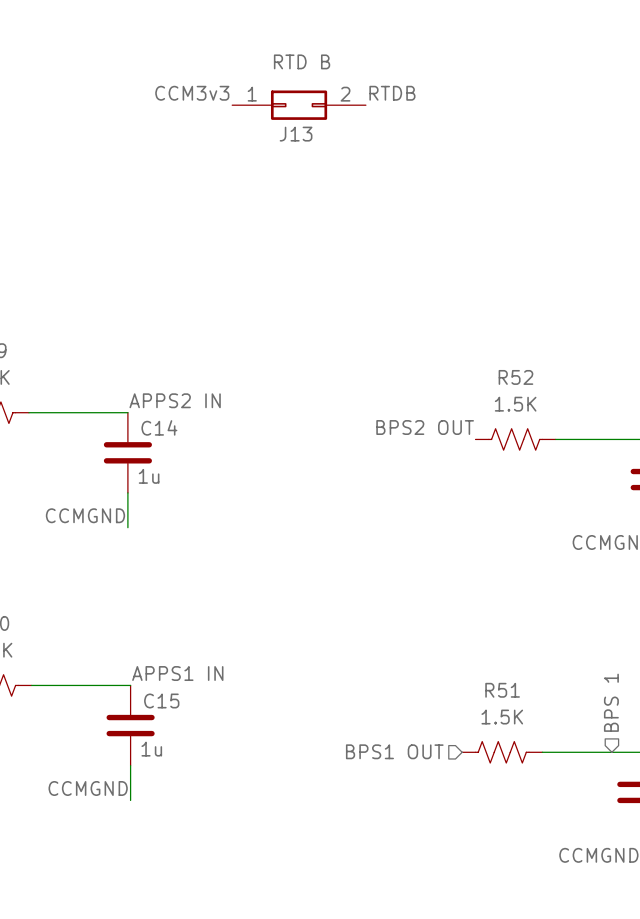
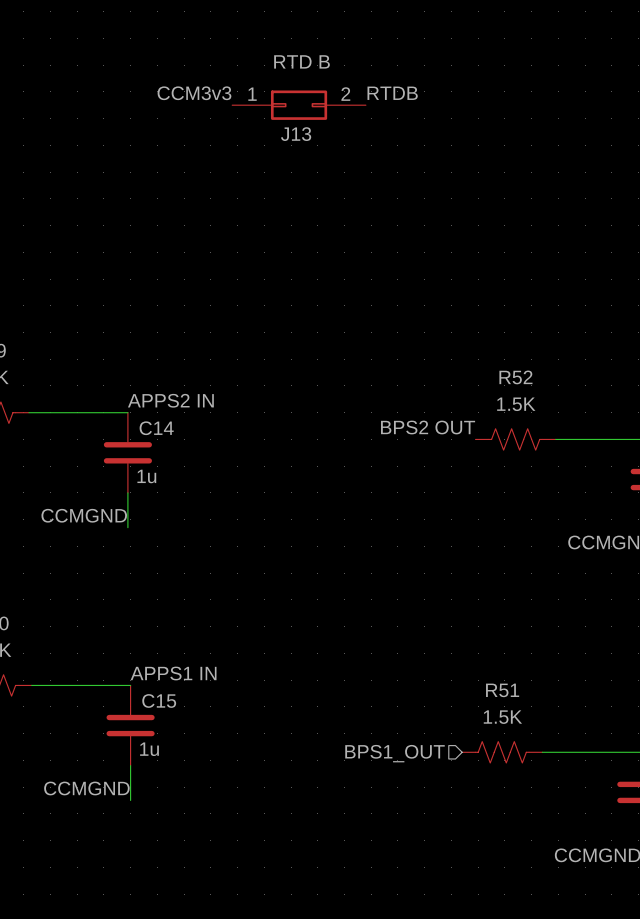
hierarchical label: BPS 1 (611, 702) -> none
hierarchical label: BPS1 OUT (394, 751) -> BPS1_OUT (395, 753)

